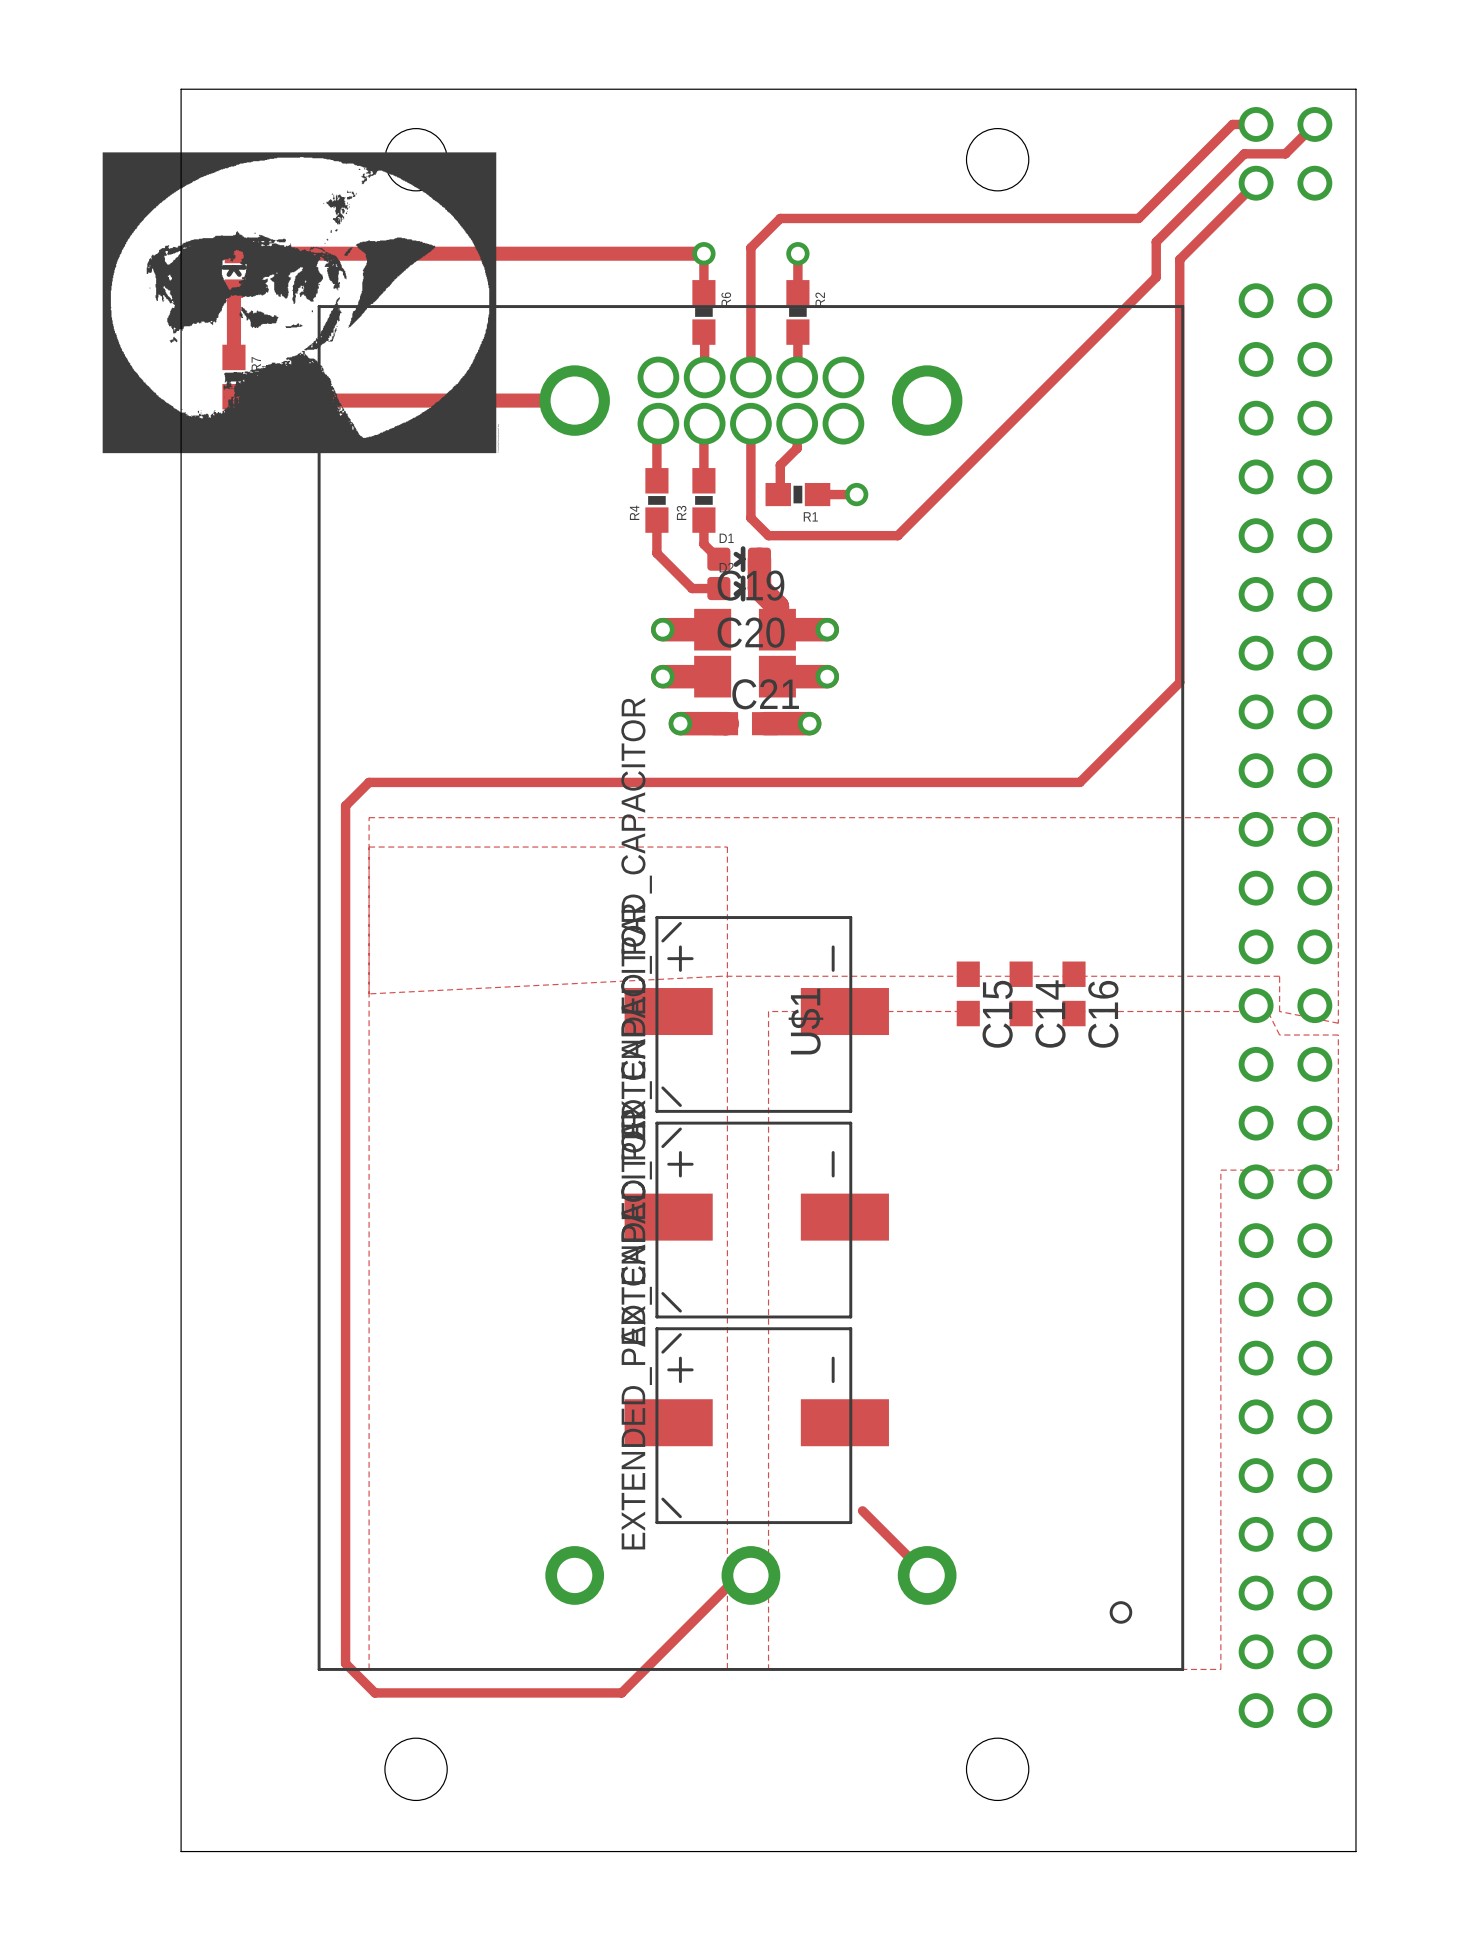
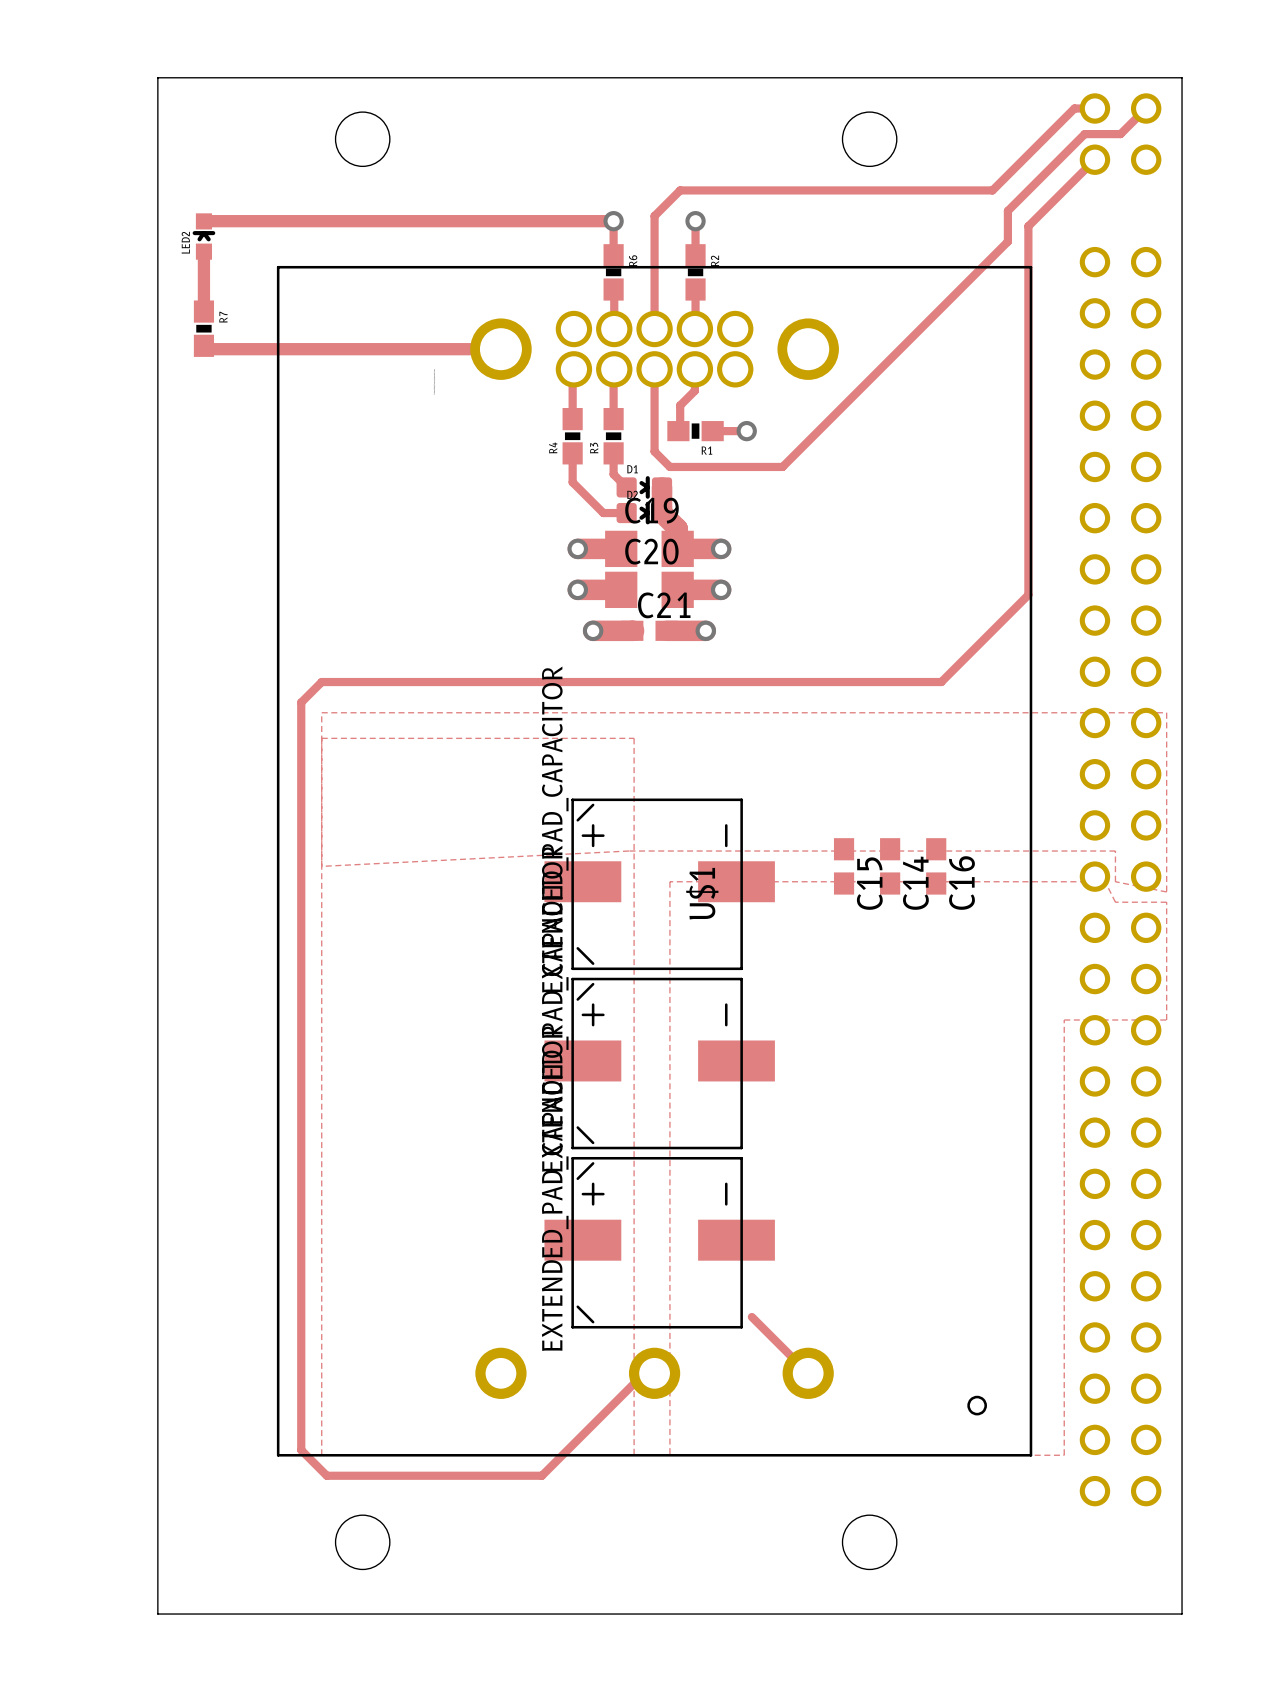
drawing: [102, 152, 497, 454] -> none

